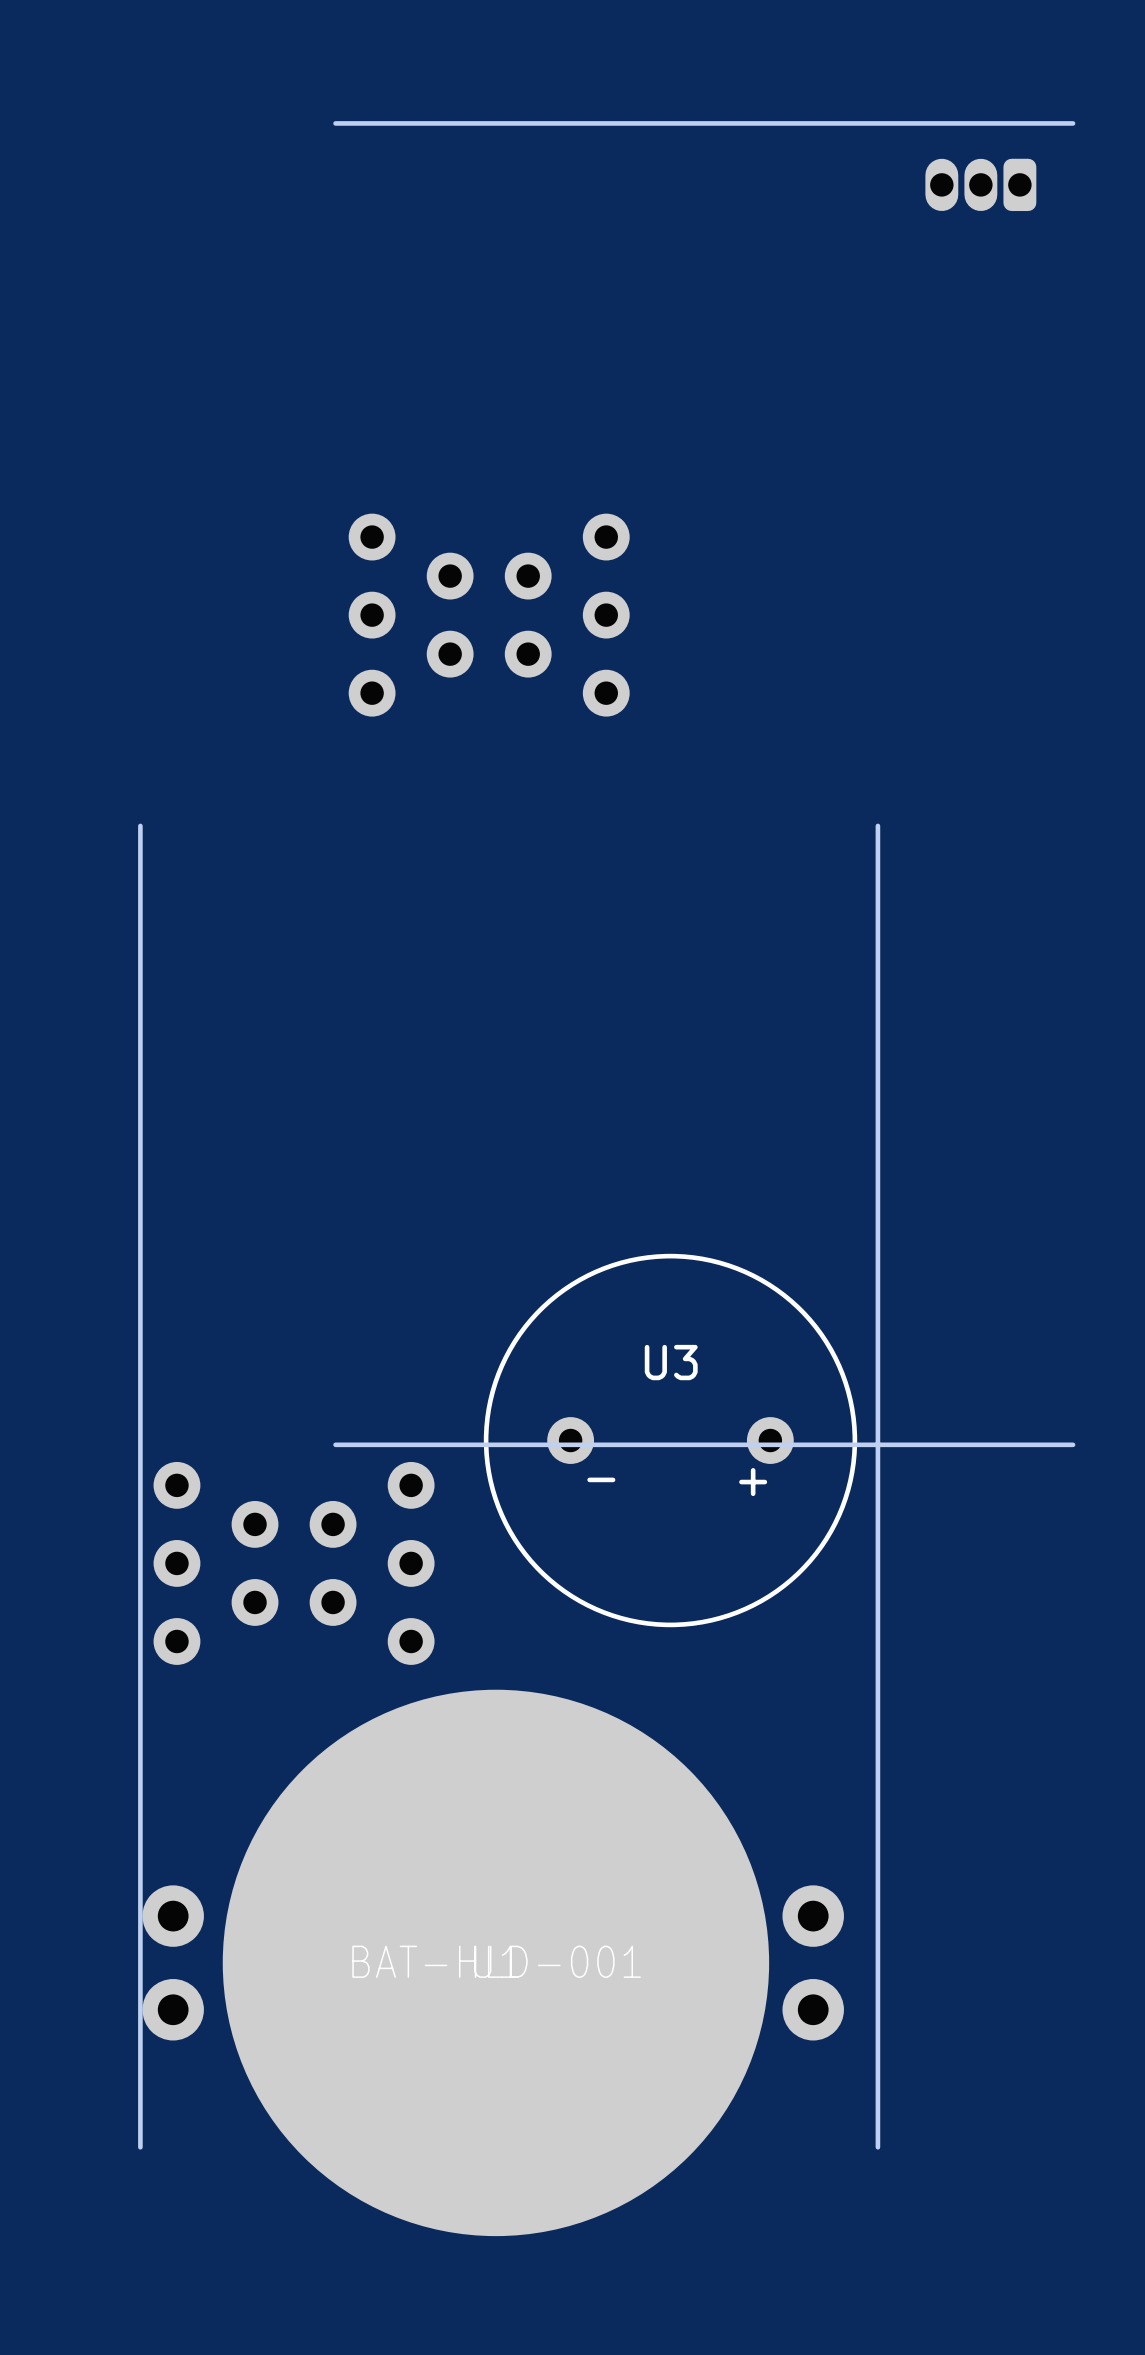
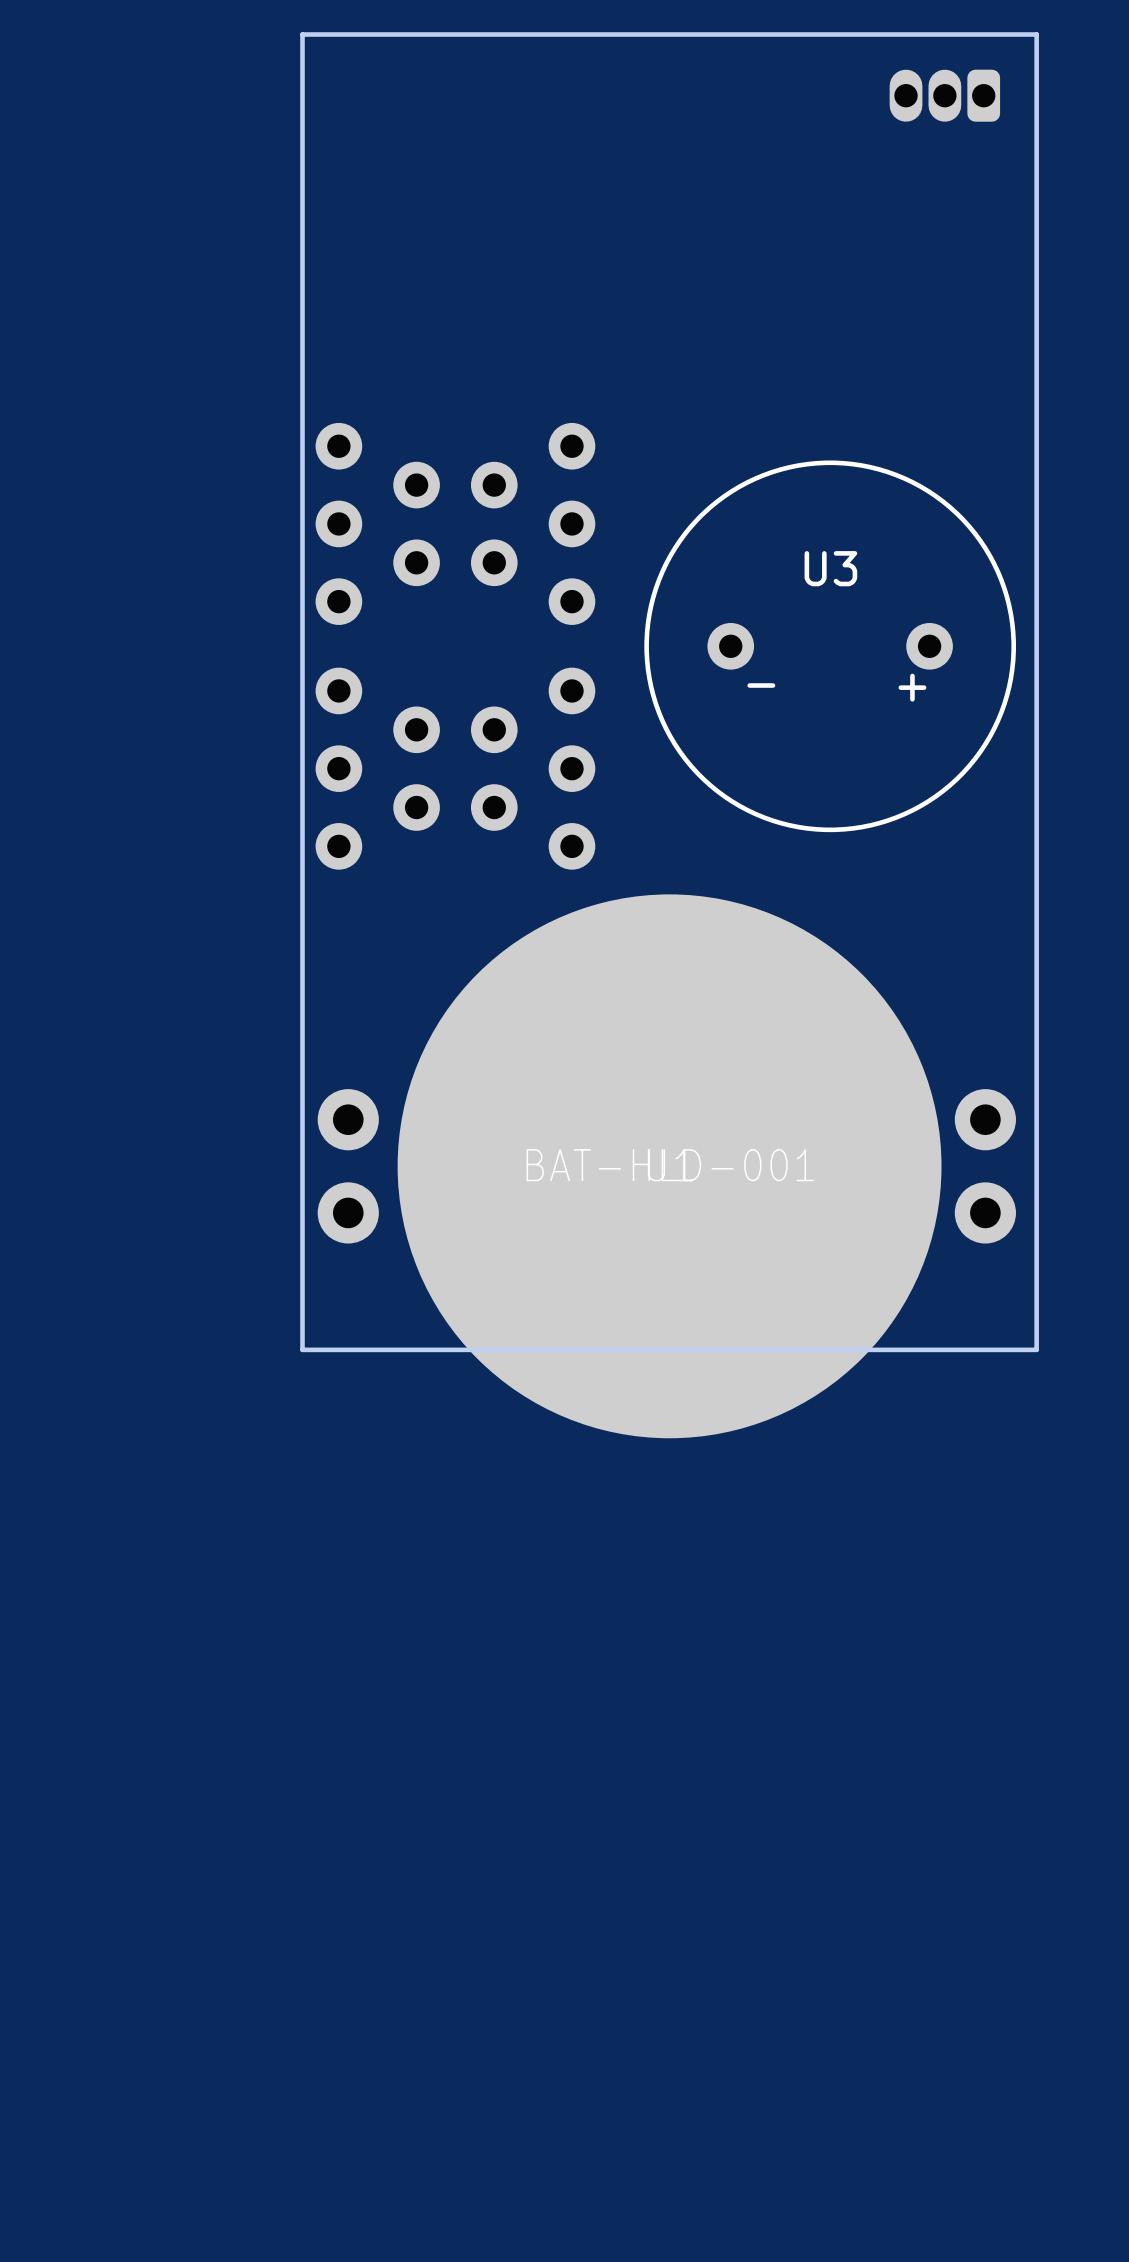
board edge: (140, 825) (140, 2147) -> (302, 34) (302, 1349)
board edge: (877, 825) (877, 2147) -> (1036, 34) (1036, 1349)
U3 position: (670, 1440) -> (830, 646)
part position: (294, 1563) -> (455, 768)
part position: (493, 1962) -> (666, 1166)

